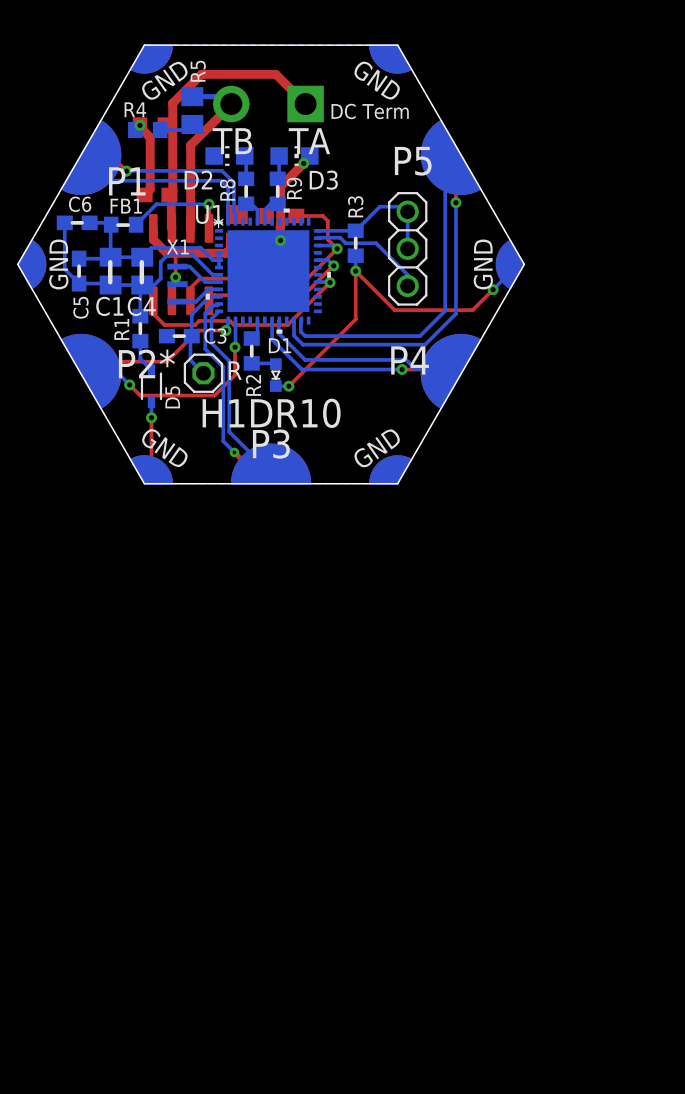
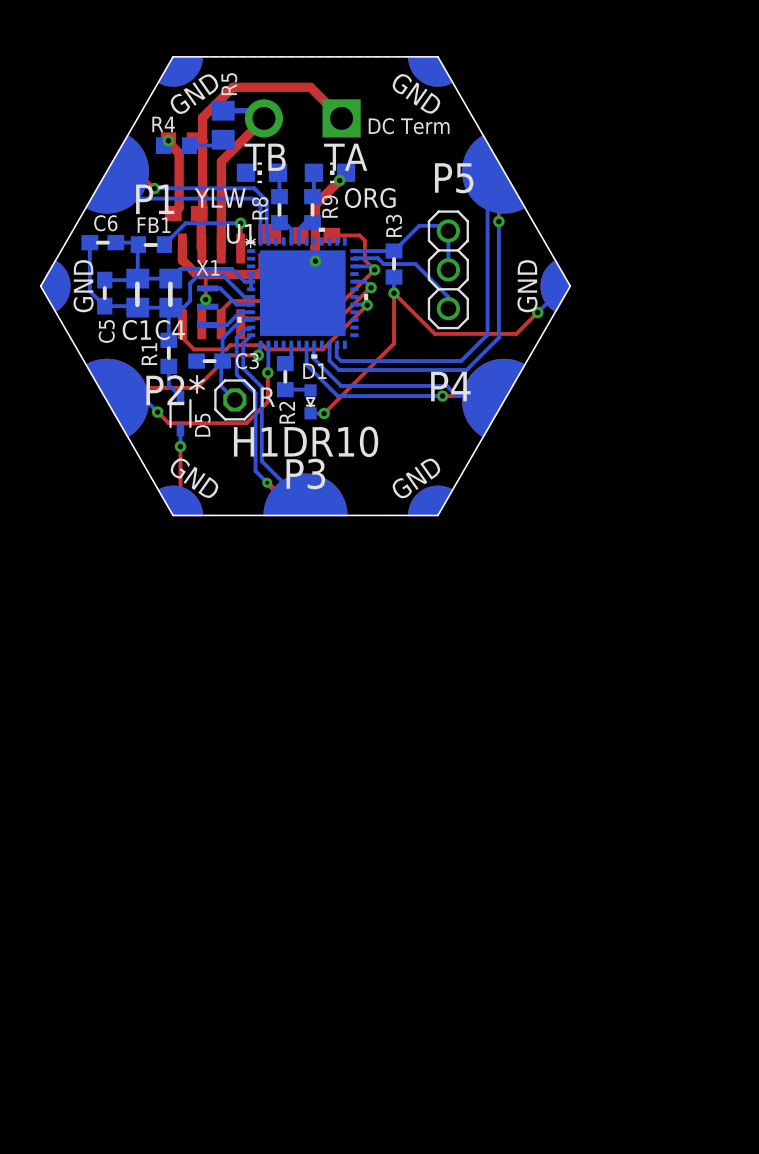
D2 name: D2 (198, 179) -> YLW (220, 198)
D3 name: D3 (323, 180) -> ORG (370, 198)

